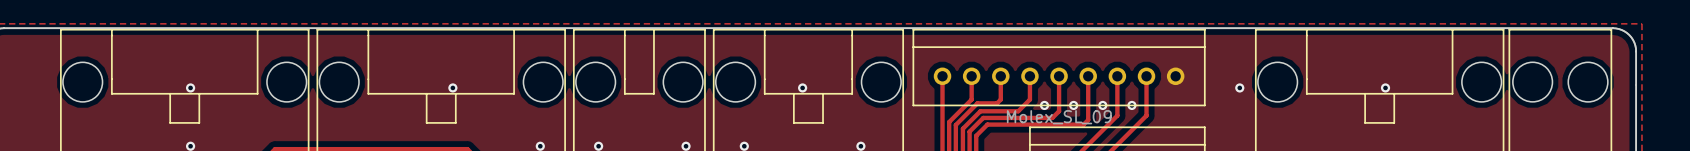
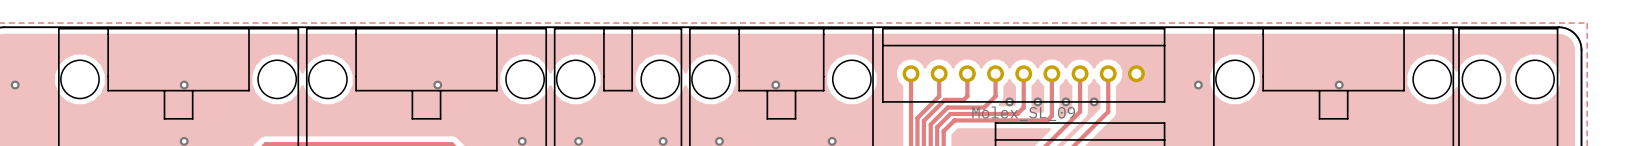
via: none -> (15, 85)

